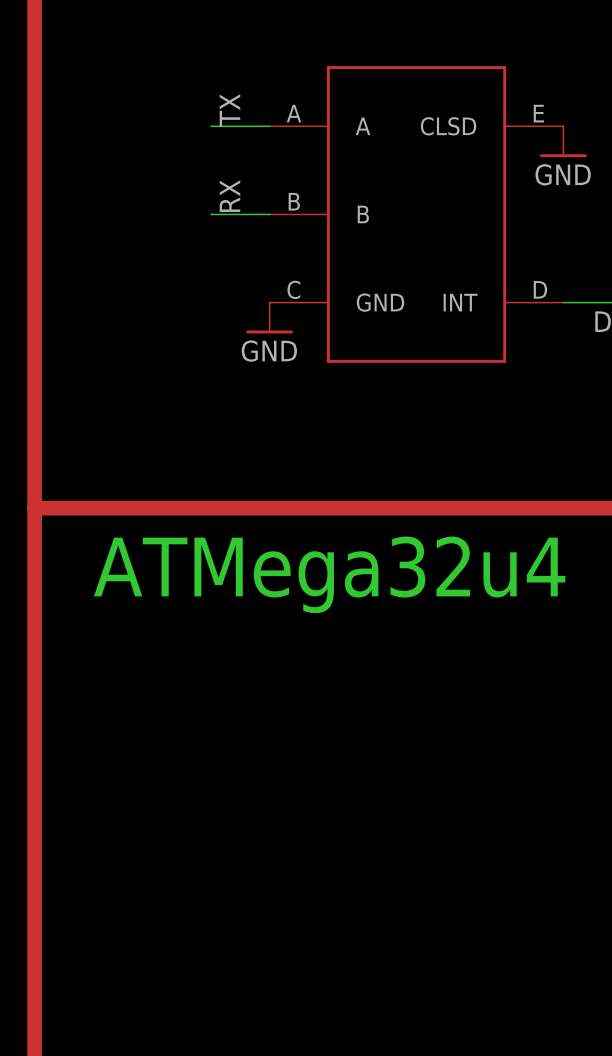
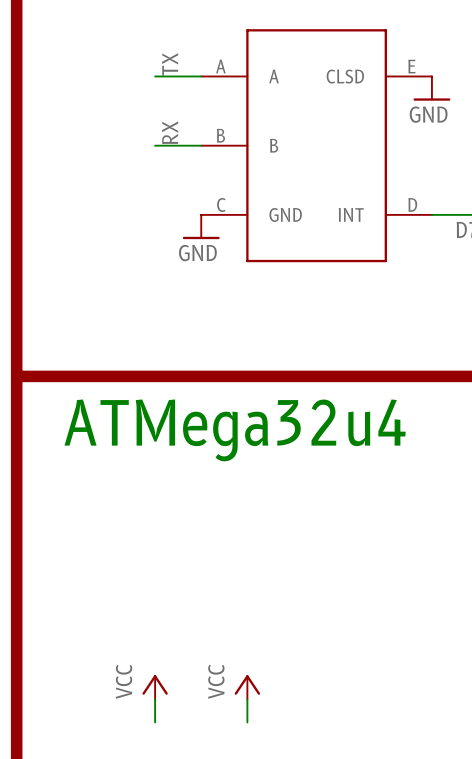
power symbol: none -> VCC (155, 687)
power symbol: none -> VCC (247, 687)
wire: none -> (155, 699) (155, 722)
wire: none -> (247, 699) (247, 722)

